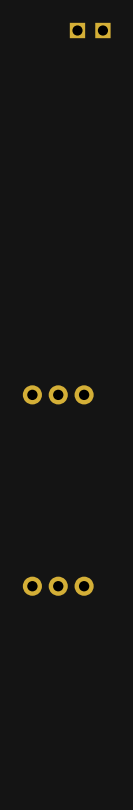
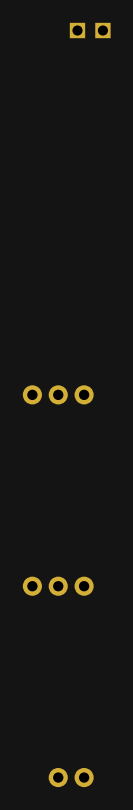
part: none -> (71, 777)

